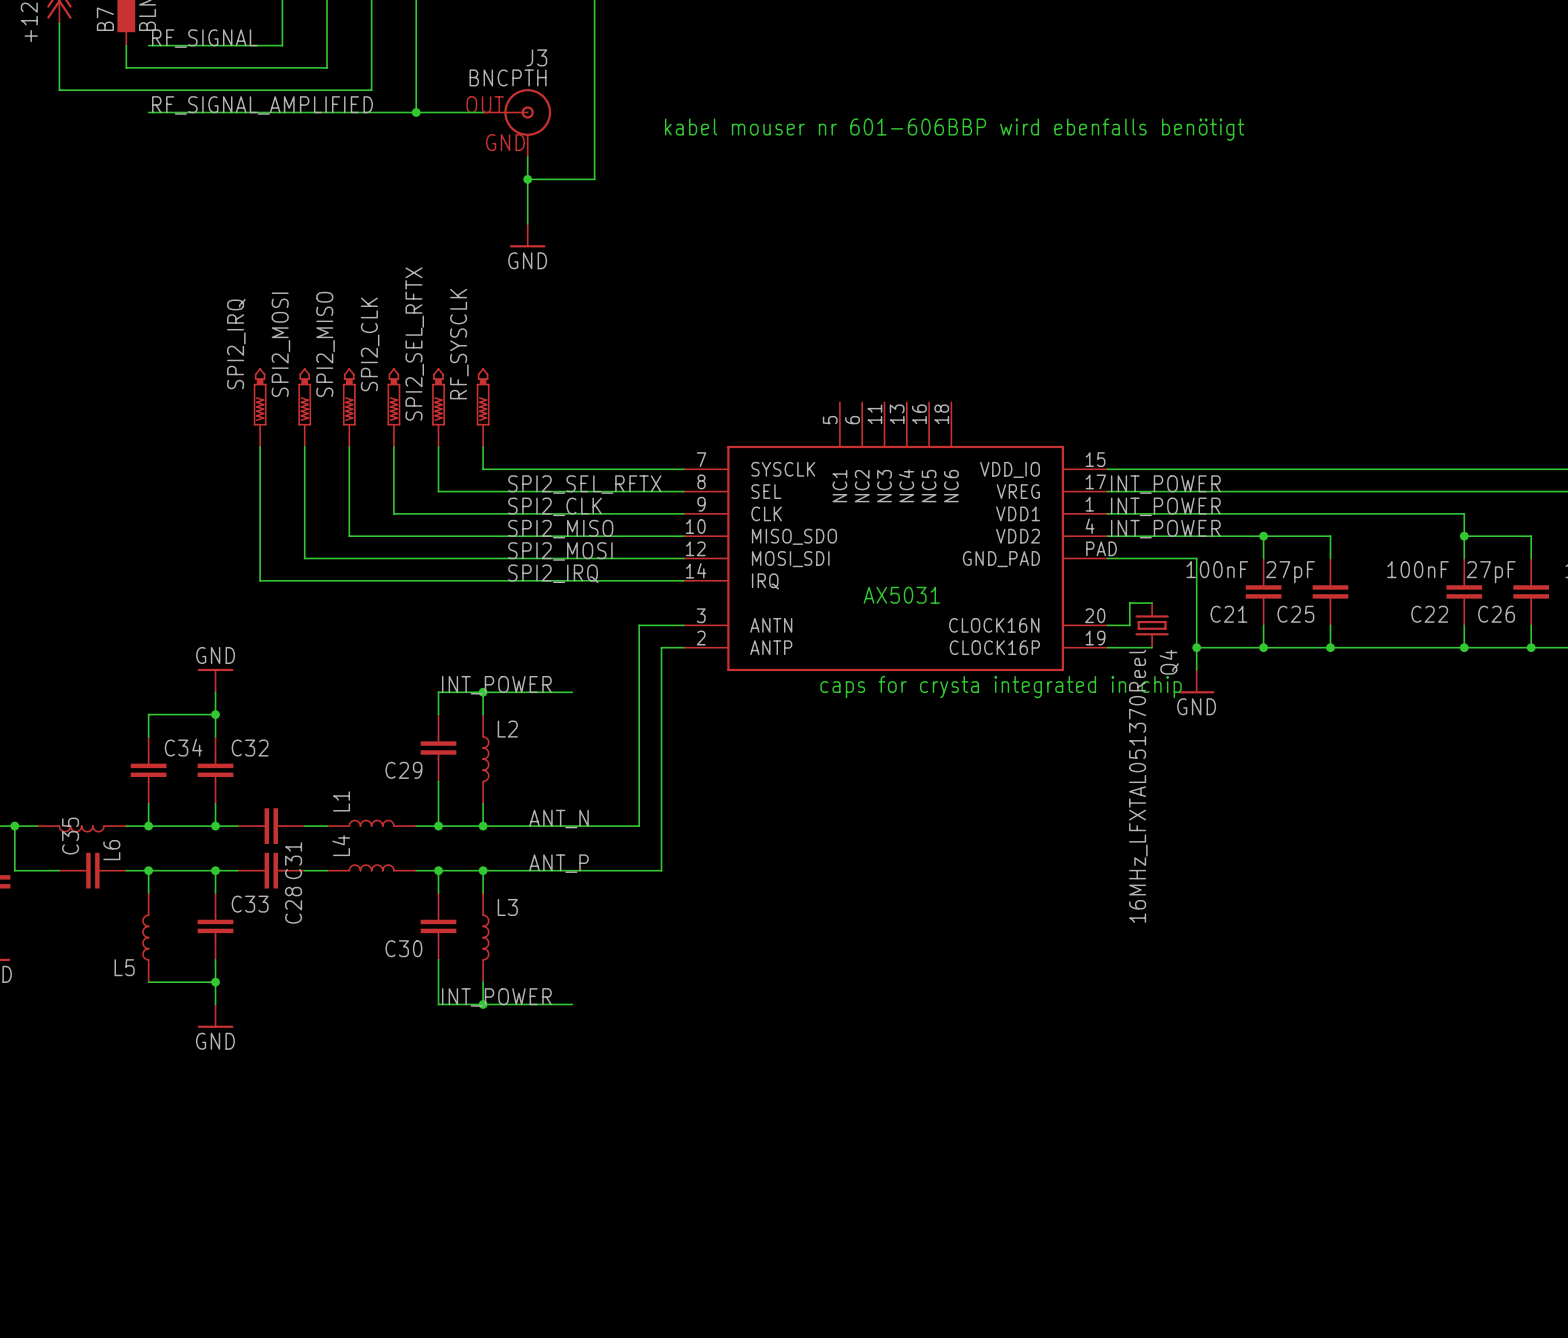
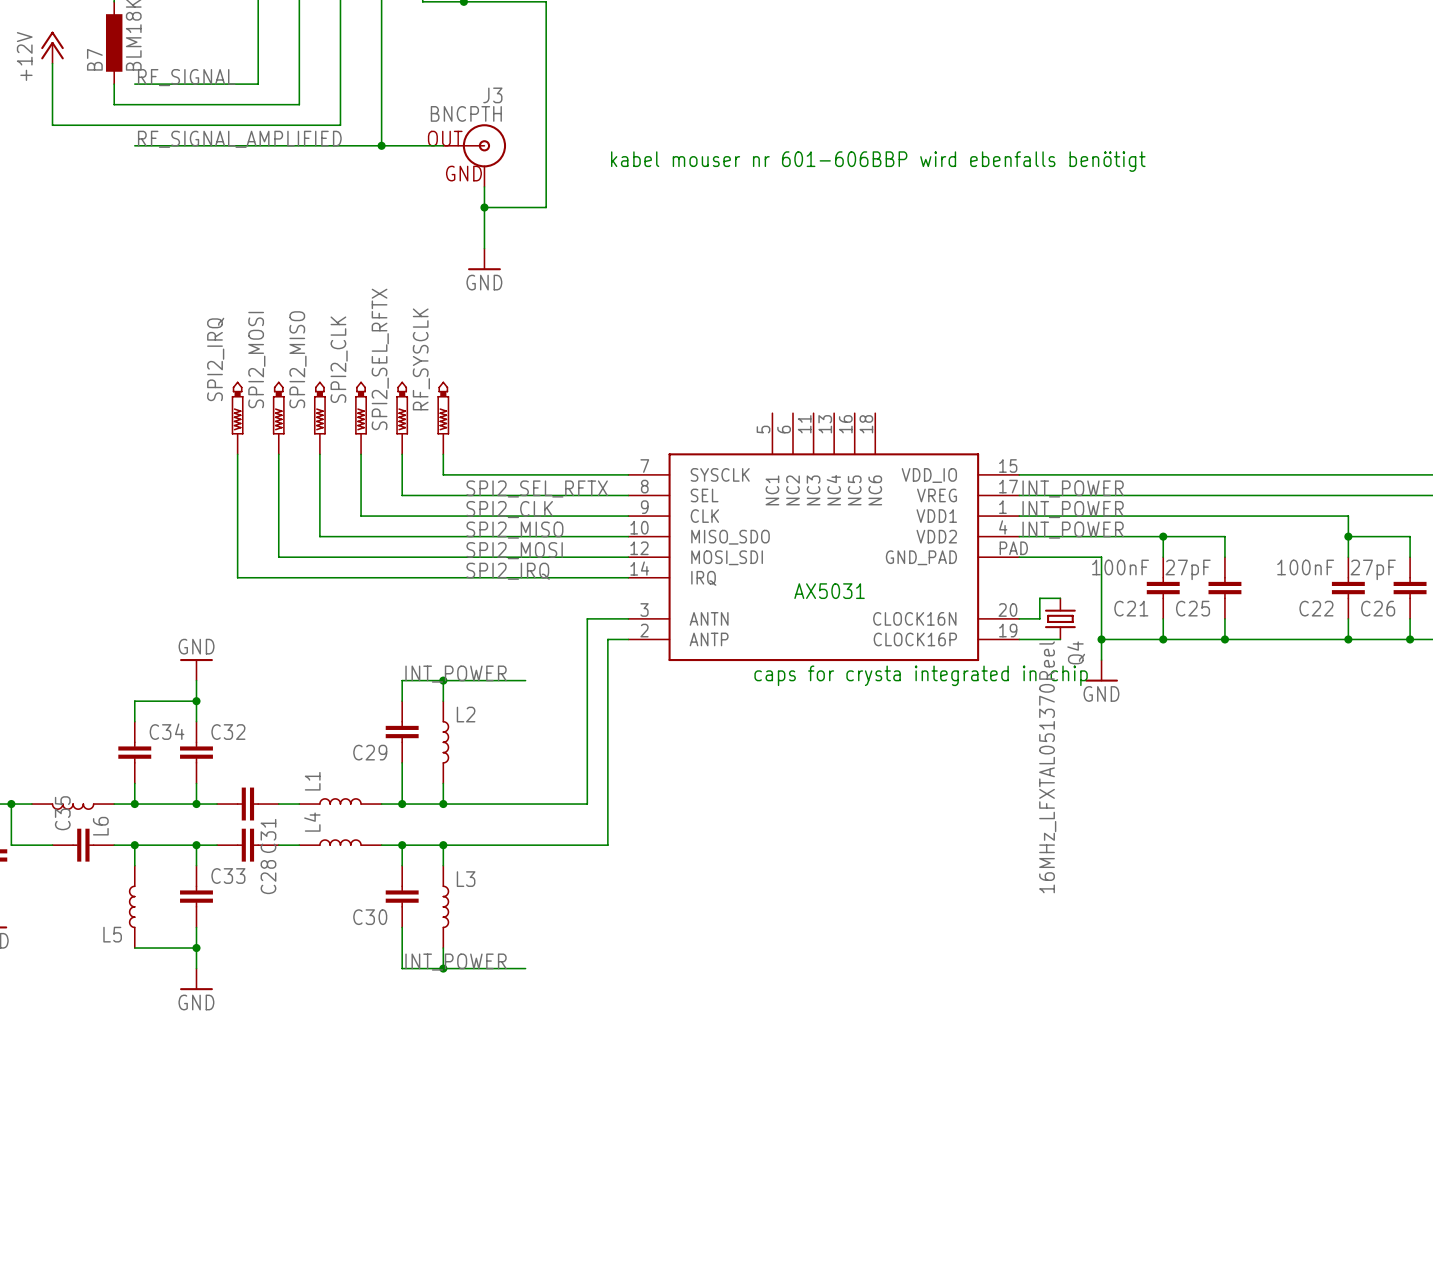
label: ANT_N (558, 819) -> none
label: ANT_P (558, 863) -> none

